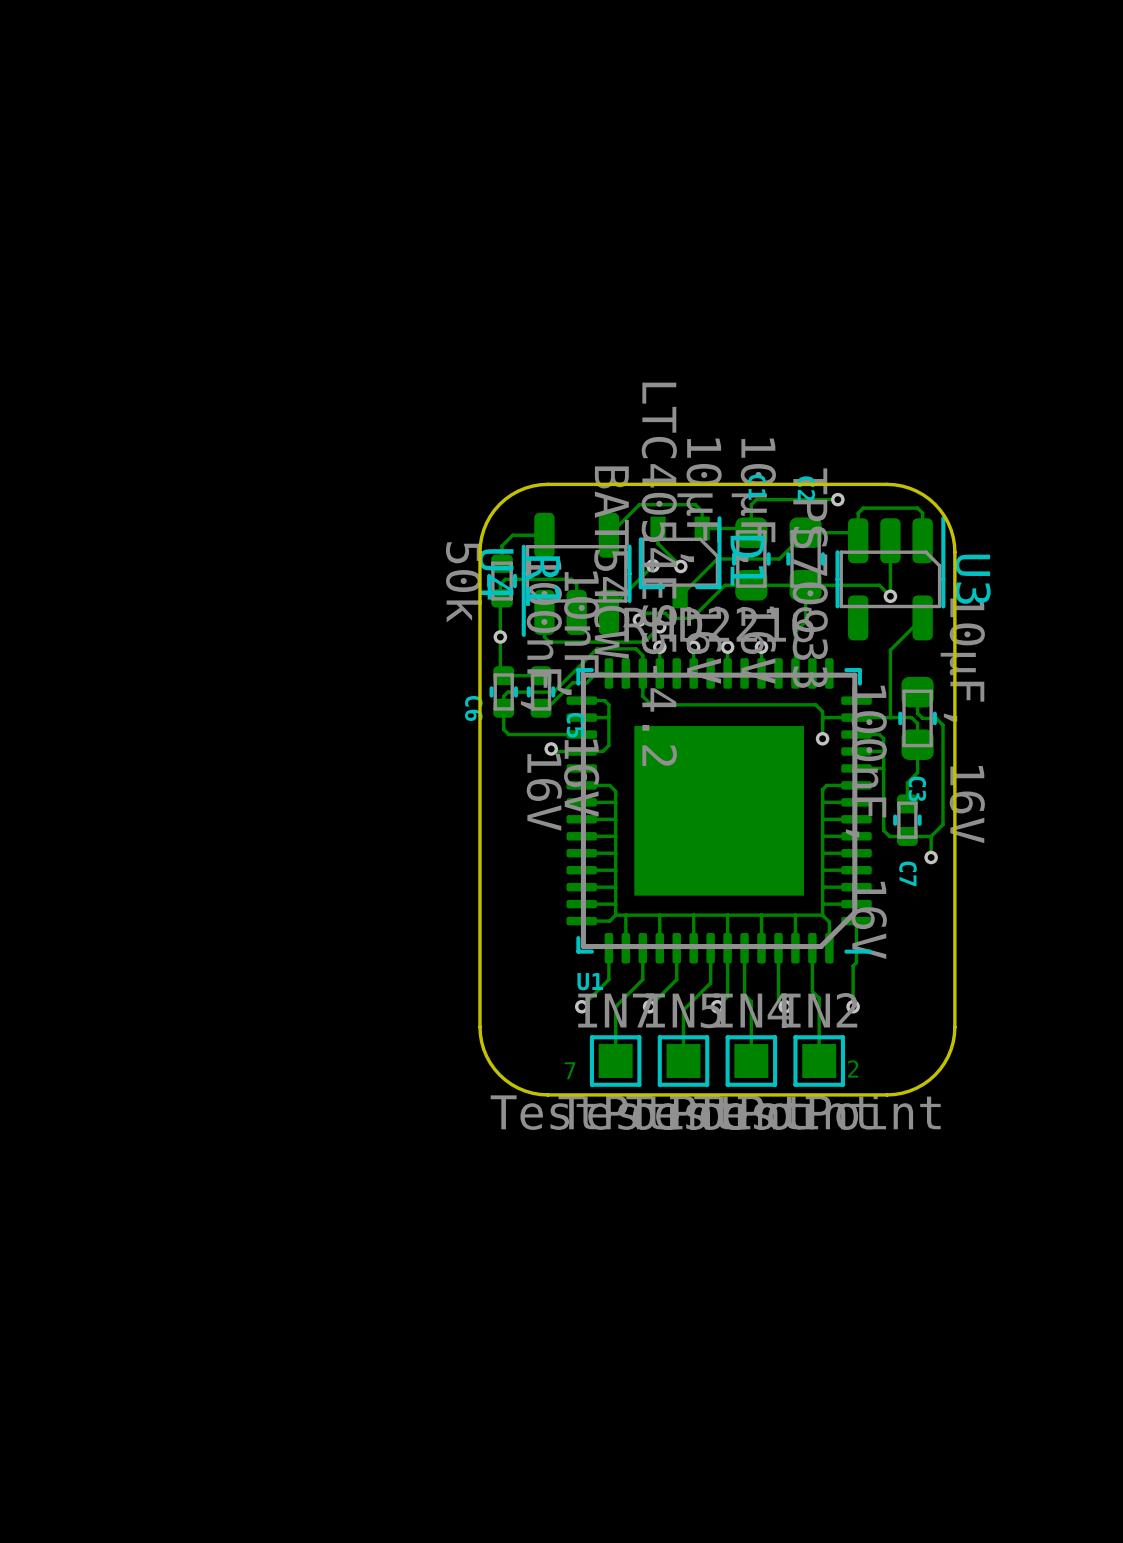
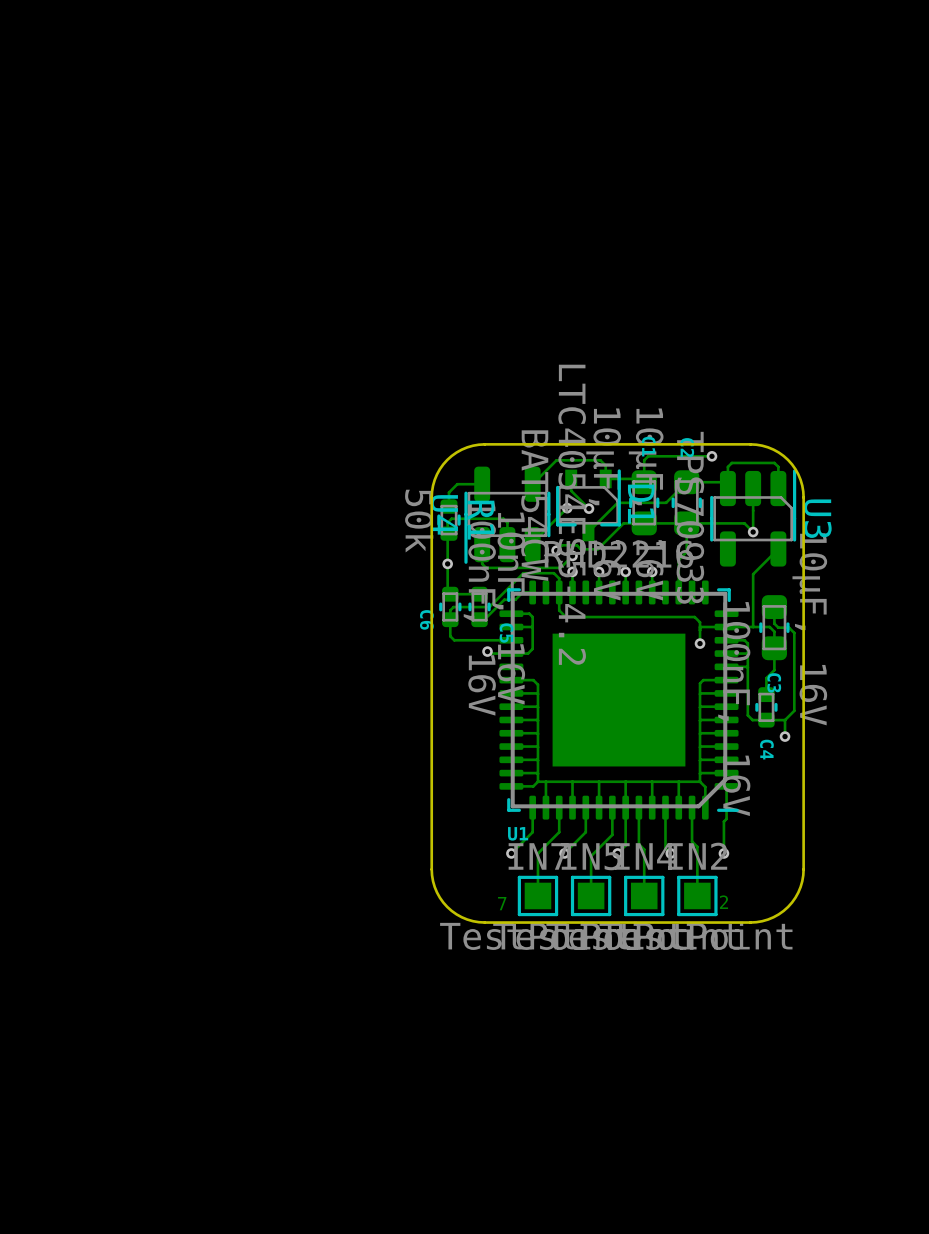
C7 name: C7 (908, 873) -> C4 (766, 749)

